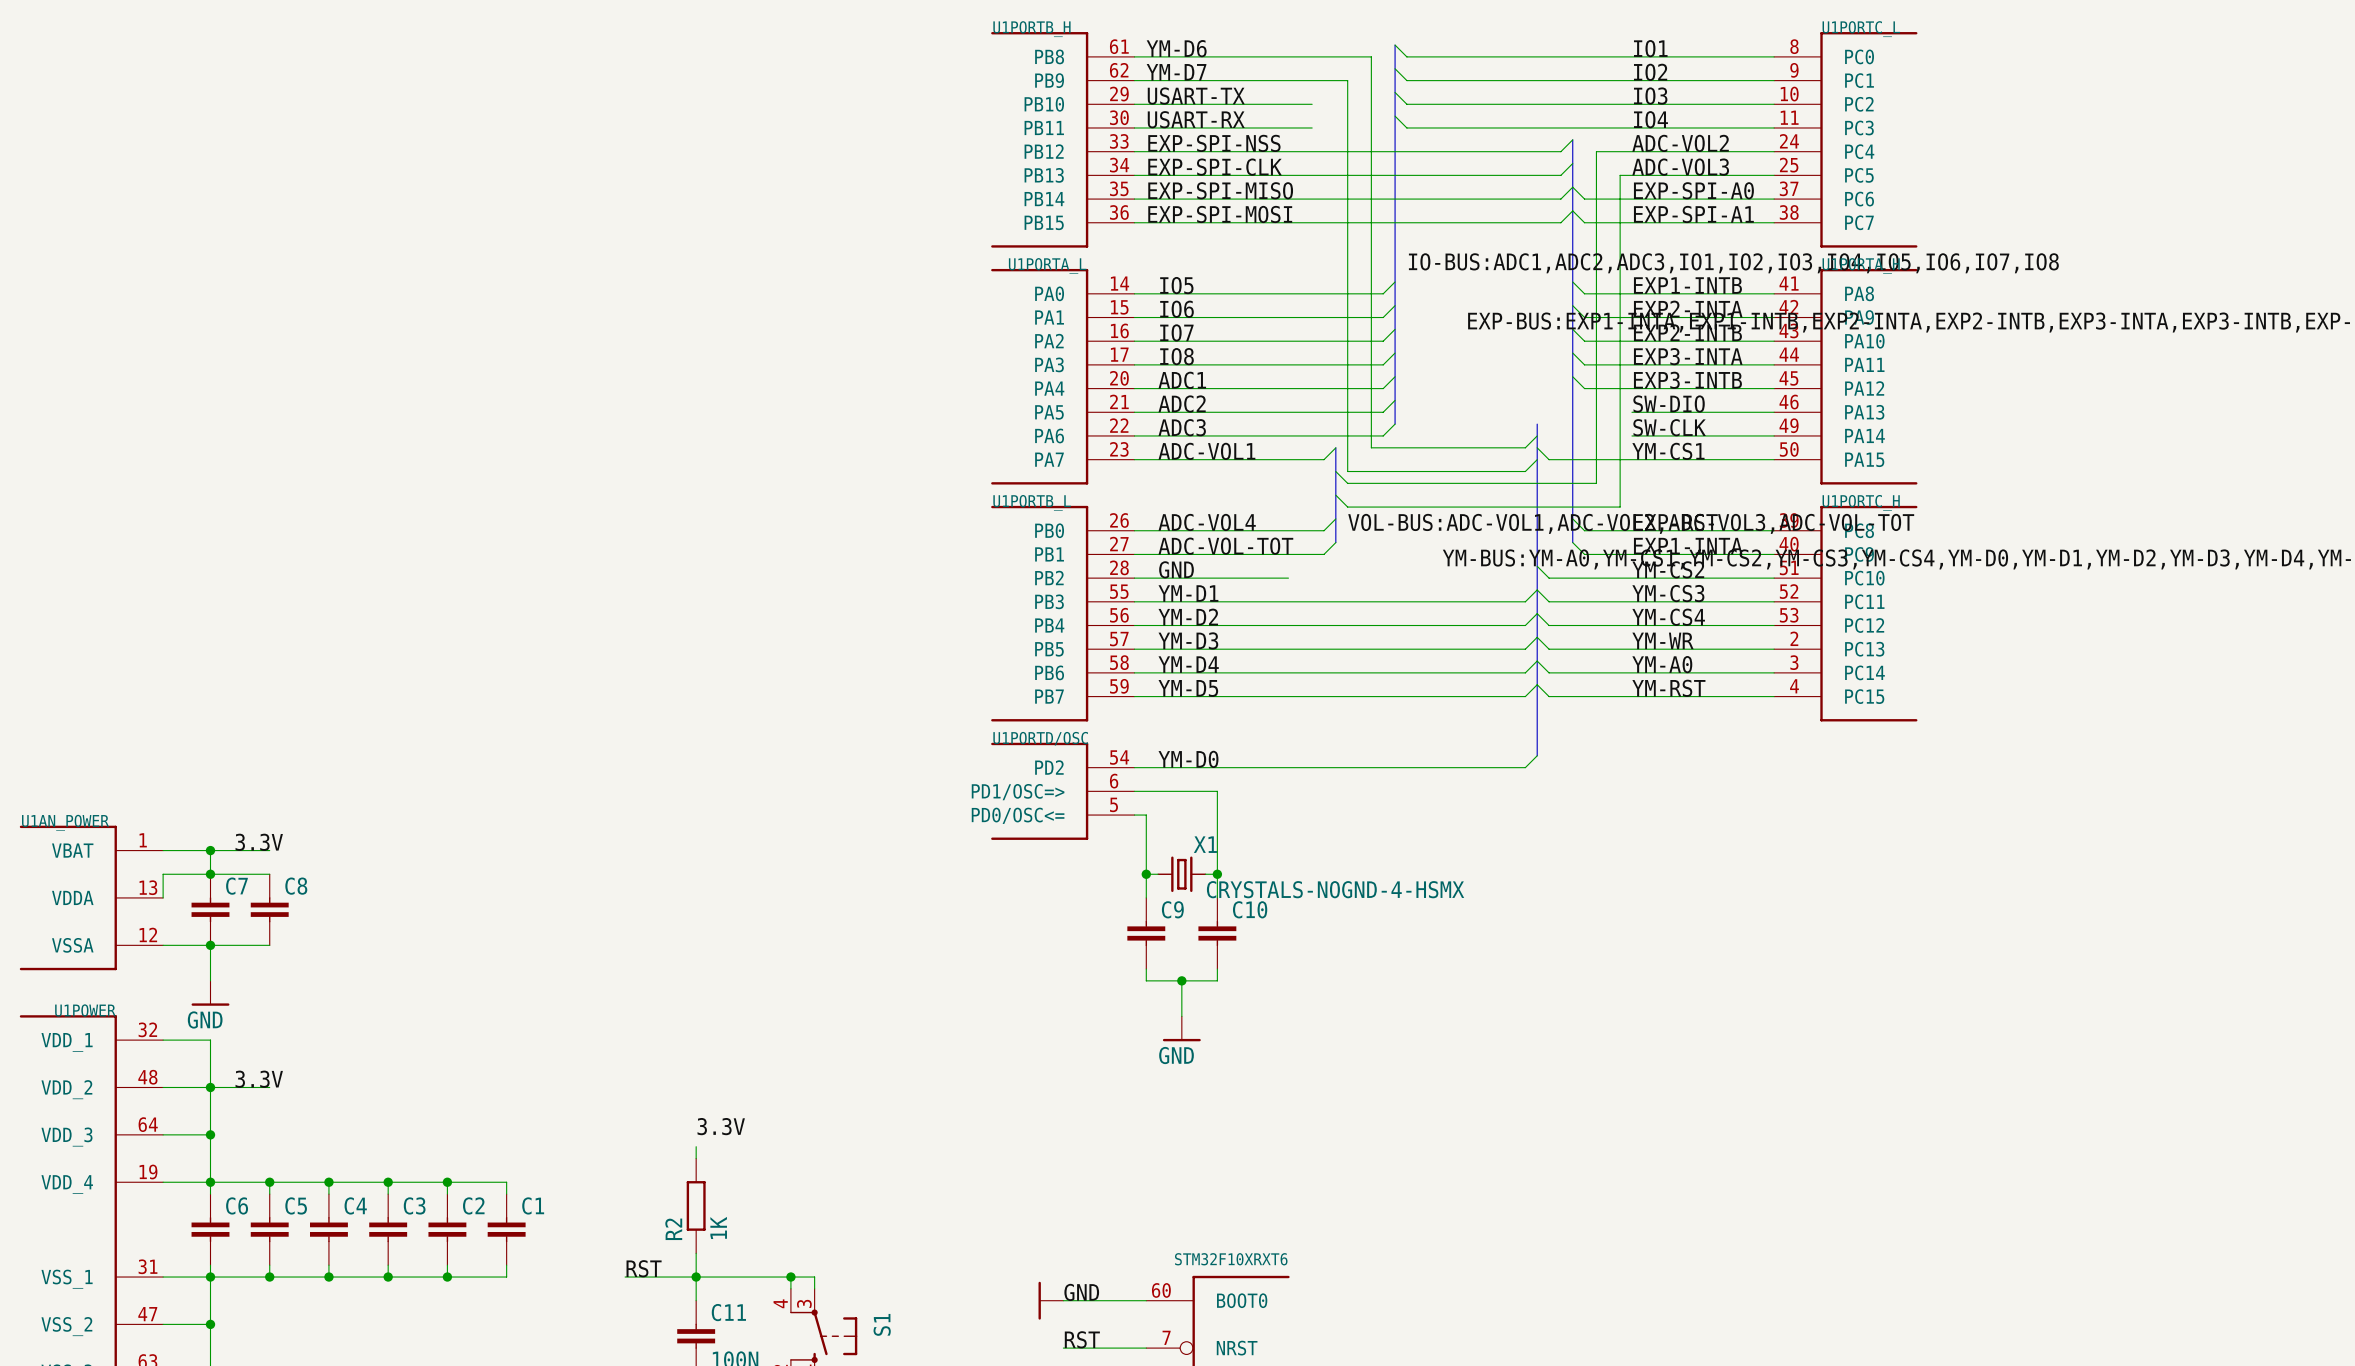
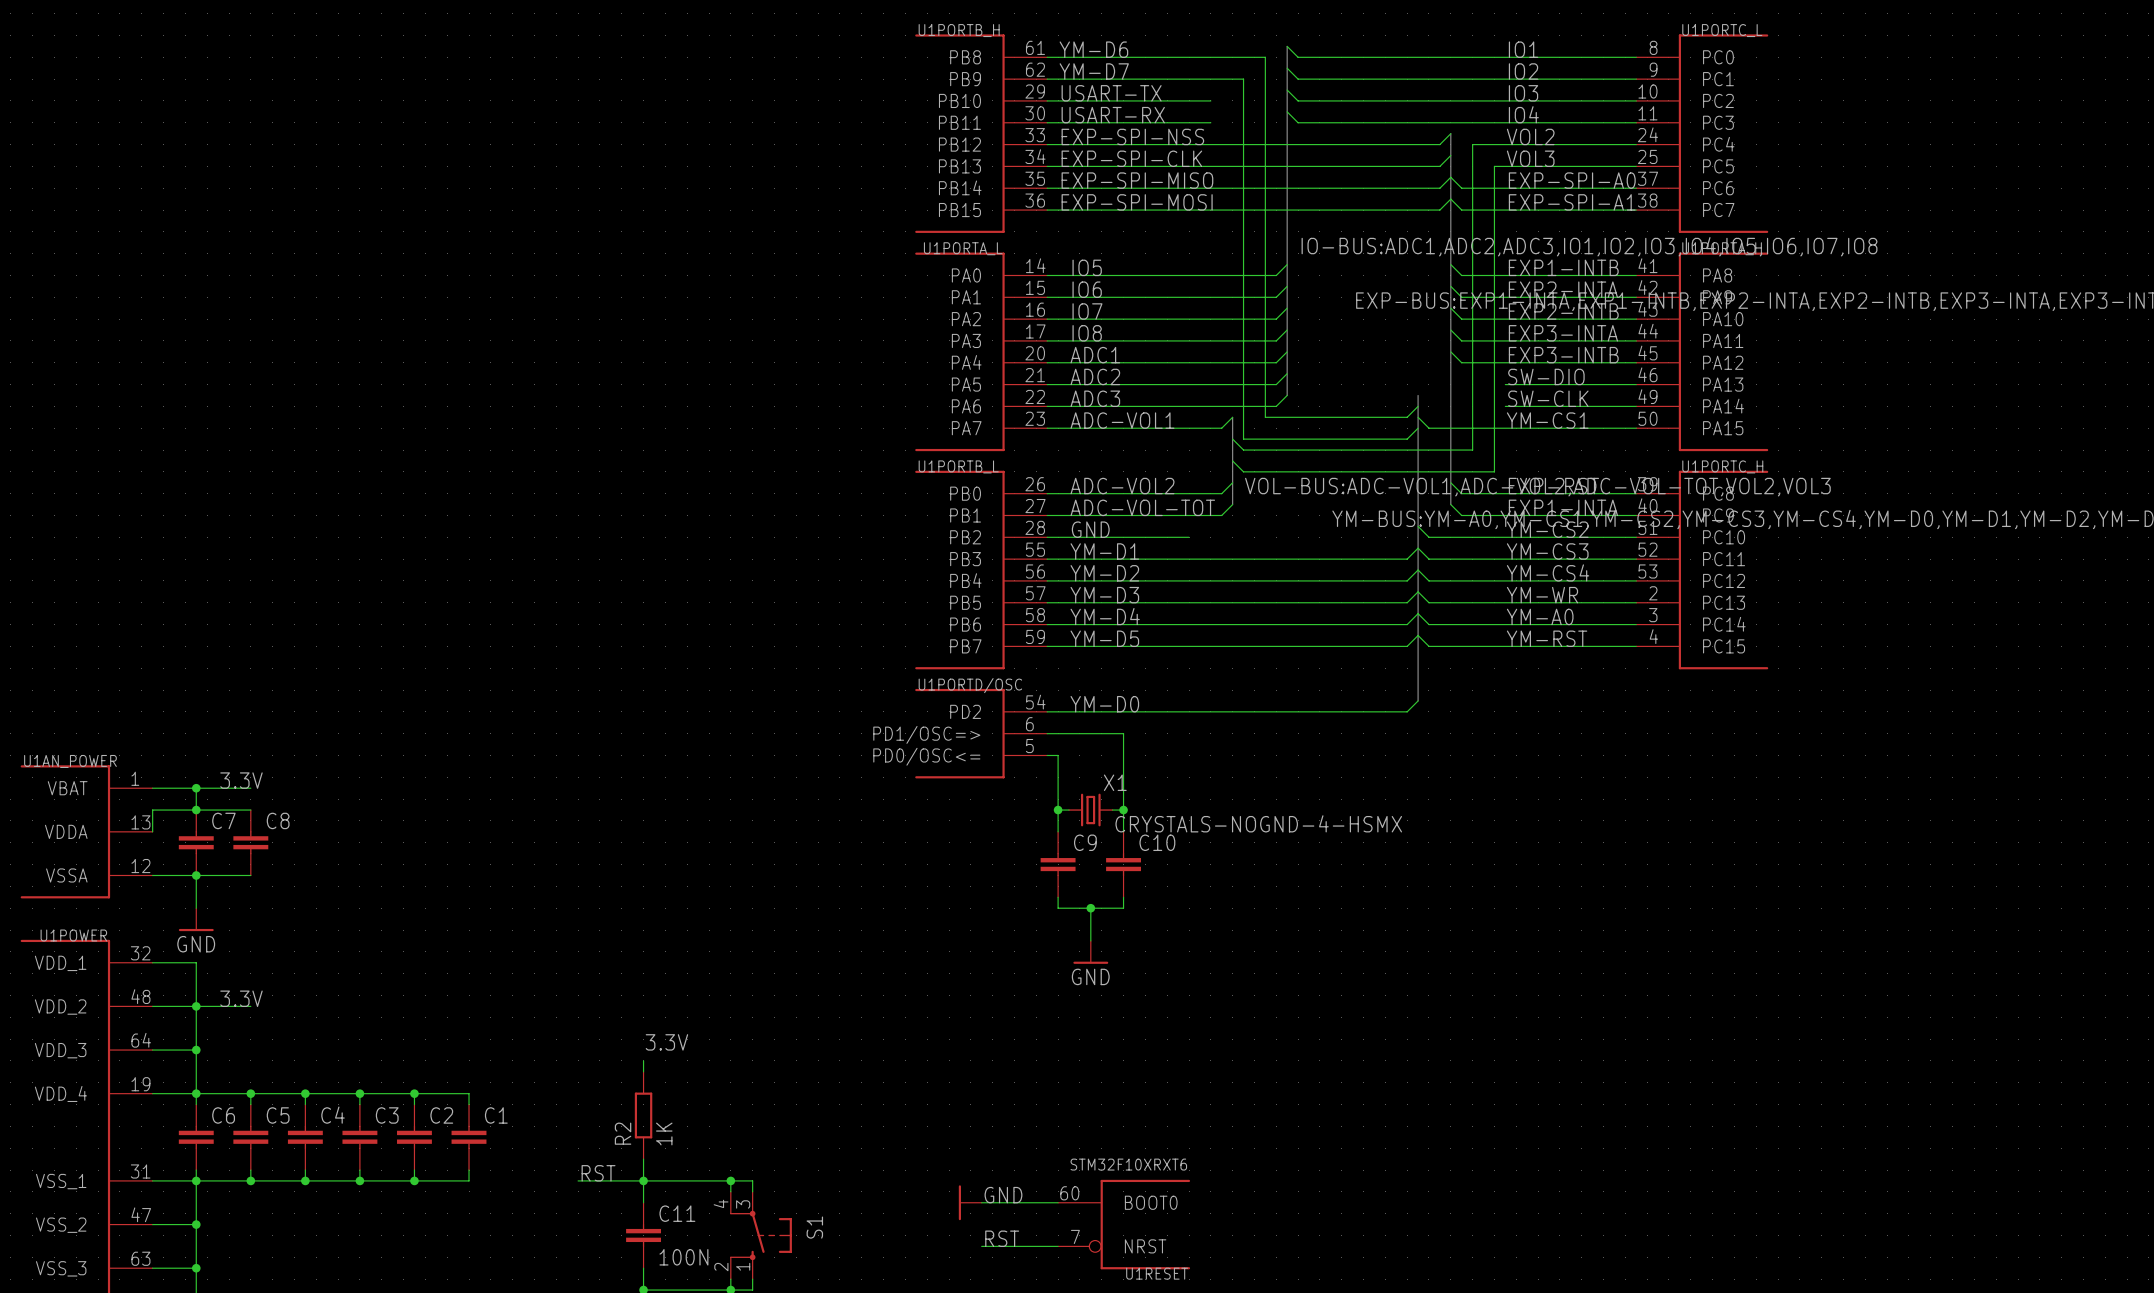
label: ADC-VOL2 (1680, 143) -> VOL2 (1530, 136)
label: ADC-VOL3 (1680, 167) -> VOL3 (1530, 158)
label: ADC-VOL4 (1207, 522) -> ADC-VOL2 (1122, 486)
label: VOL-BUS:ADC-VOL1,ADC-VOL2,ADC-VOL3,ADC-VOL-TOT (1631, 523) -> VOL-BUS:ADC-VOL1,ADC-VOL2,ADC-VOL-TOT,VOL2,VOL3 (1537, 487)

